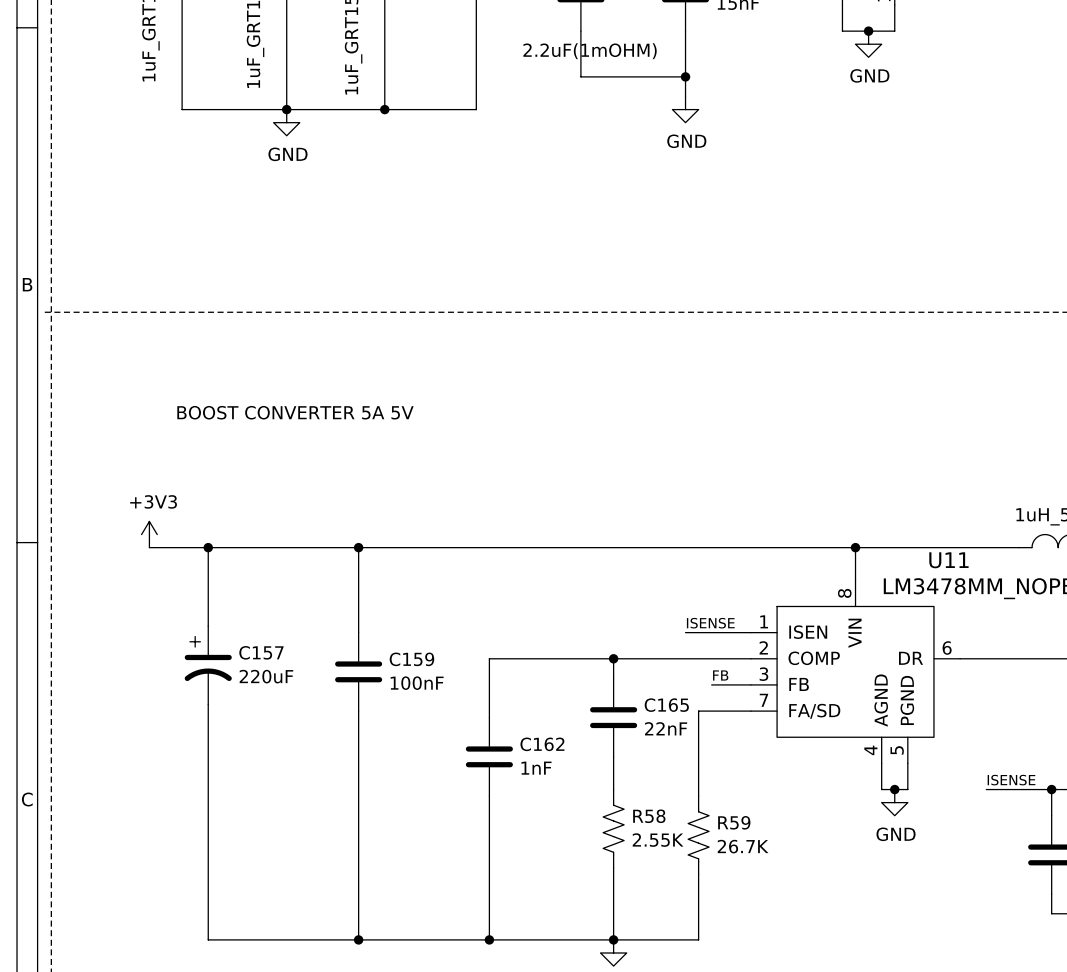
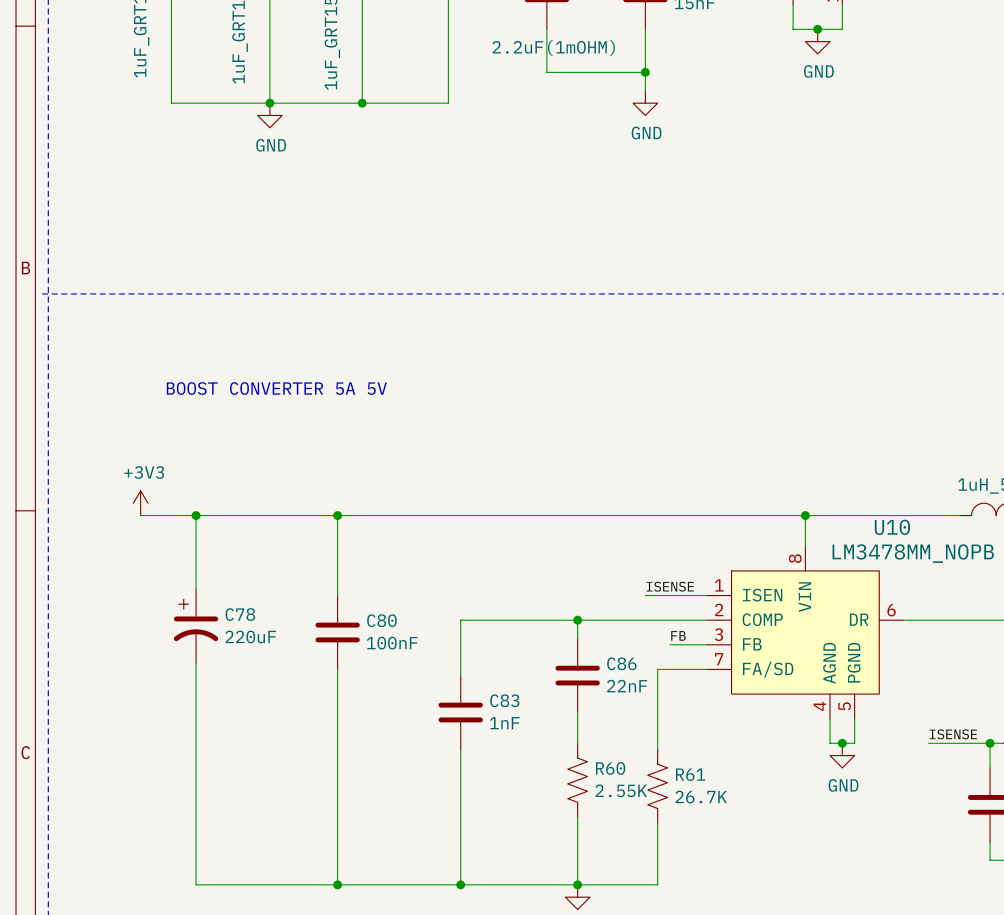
U11 name: U11 (948, 560) -> U10 (892, 527)
C157 name: C157 (261, 652) -> C78 (240, 614)
C159 name: C159 (411, 659) -> C80 (381, 620)
C165 name: C165 (666, 705) -> C86 (621, 663)
C162 name: C162 (542, 744) -> C83 (504, 700)
R58 name: R58 (649, 816) -> R60 (610, 768)
R59 name: R59 (734, 822) -> R61 (690, 774)

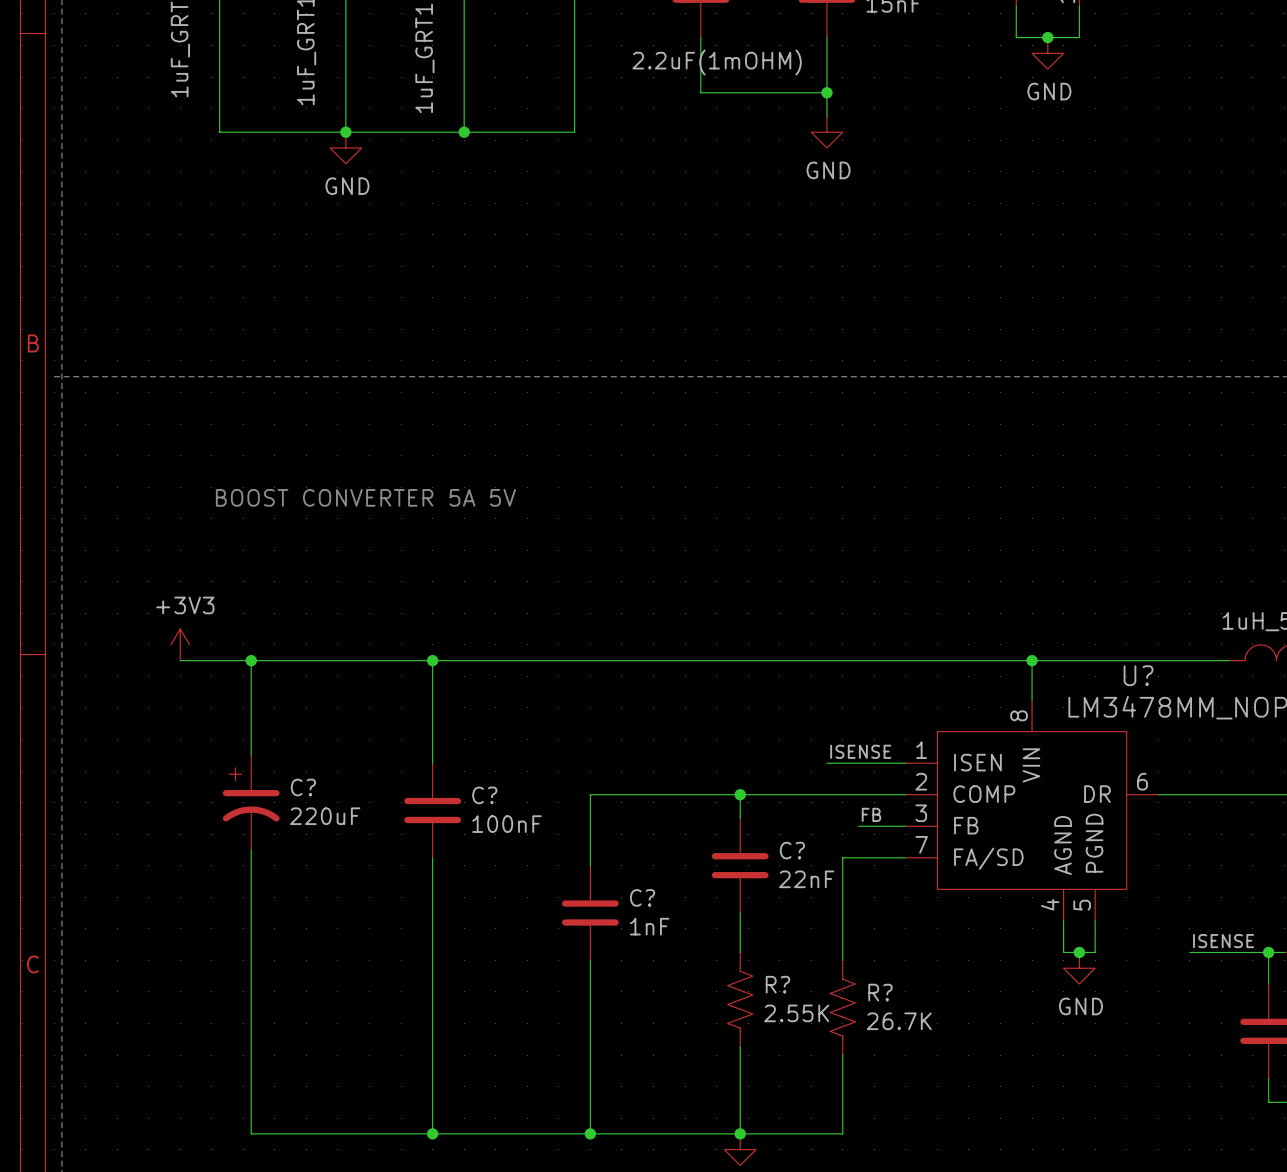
U10 name: U10 (892, 527) -> U? (1138, 675)
C78 name: C78 (240, 614) -> C? (303, 787)
C80 name: C80 (381, 620) -> C? (484, 795)
C86 name: C86 (621, 663) -> C? (792, 850)
C83 name: C83 (504, 700) -> C? (642, 897)
R60 name: R60 (610, 768) -> R? (777, 984)
R61 name: R61 (690, 774) -> R? (880, 992)

